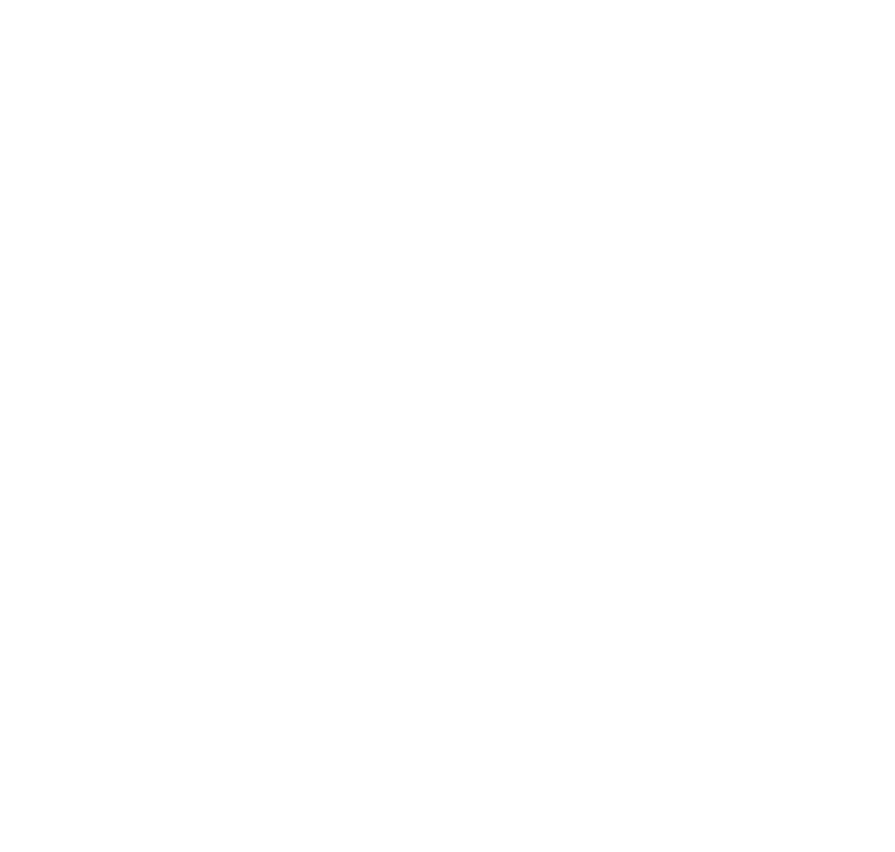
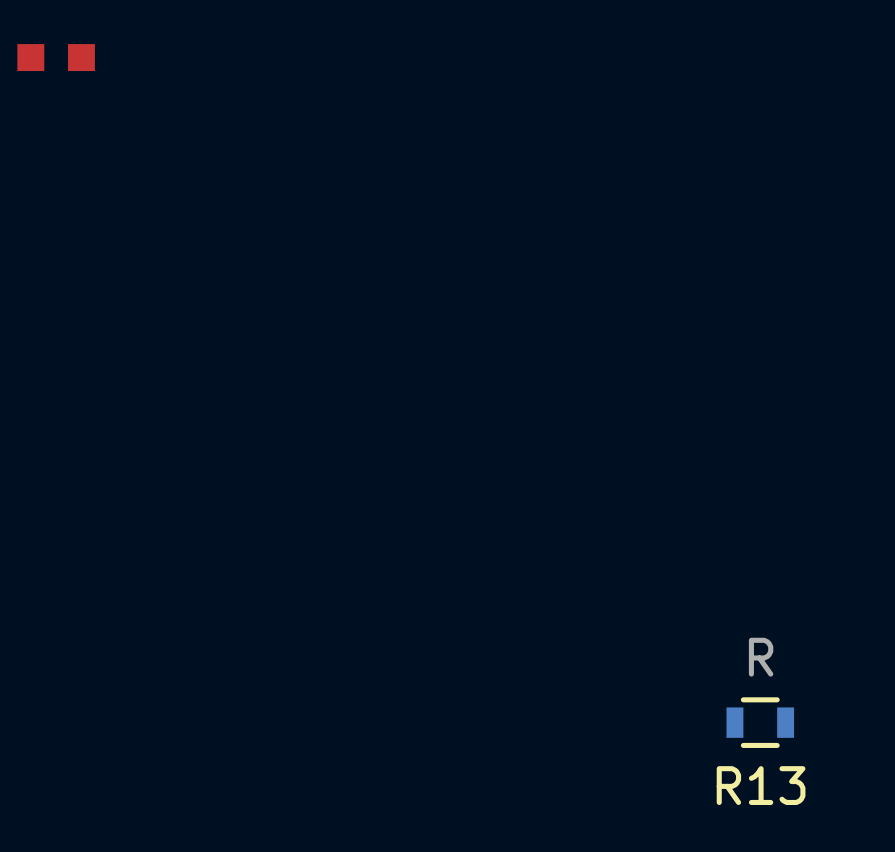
part: none -> (56, 57)
R13: none -> R (760, 722)

